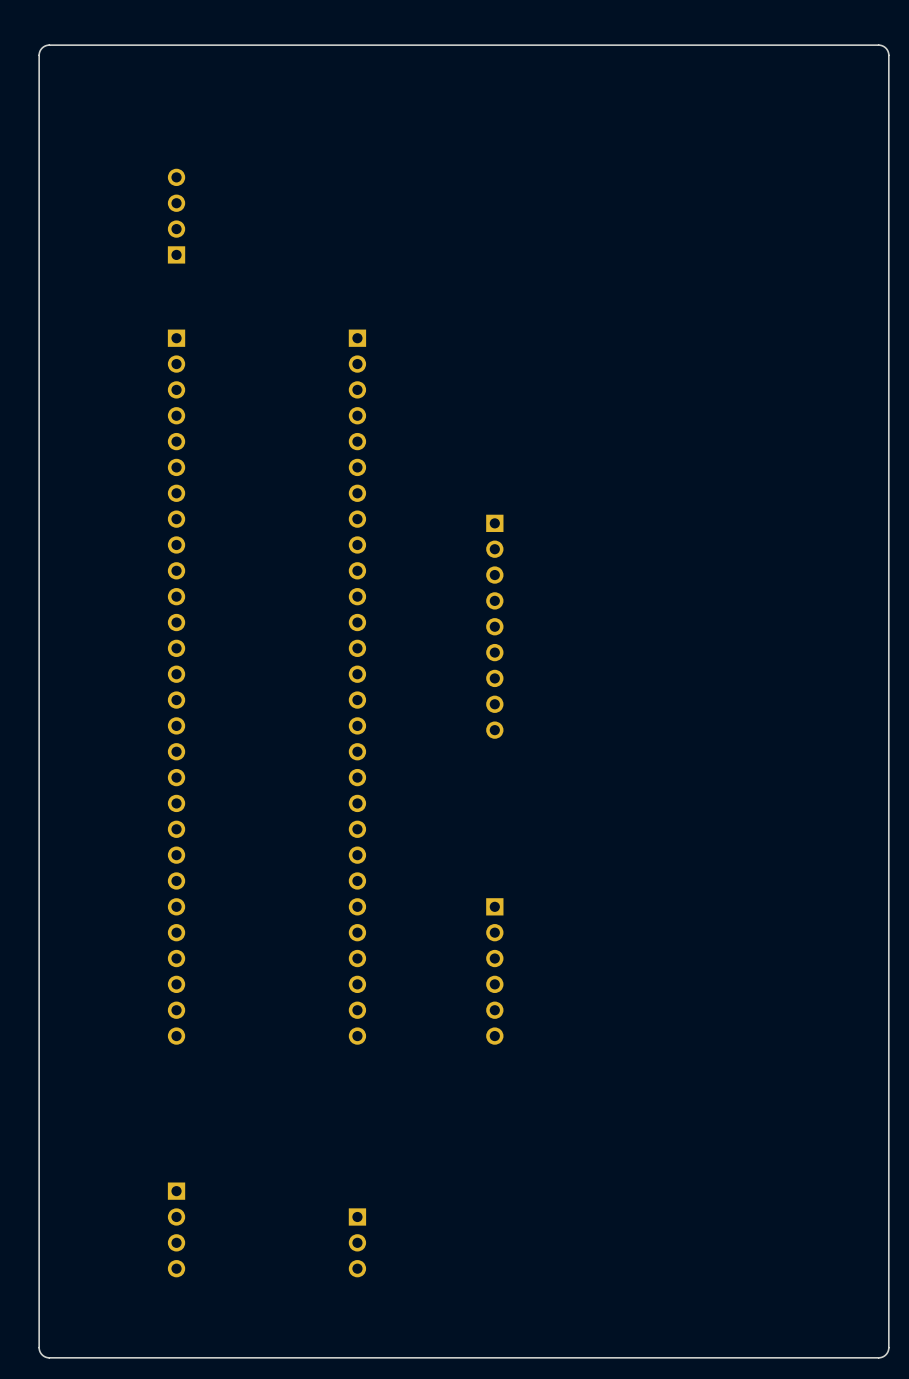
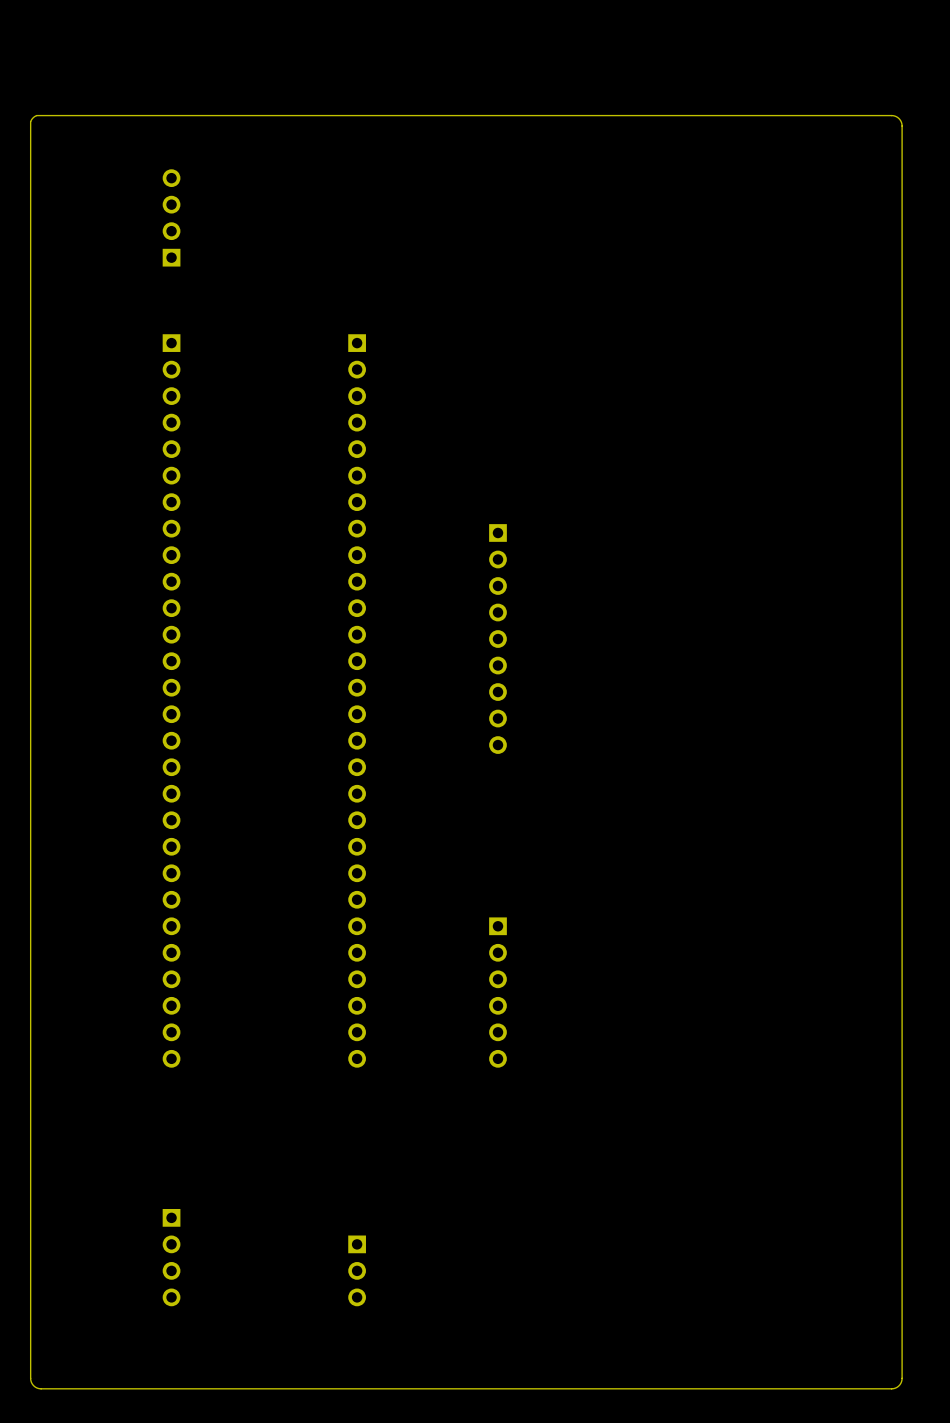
board edge: (39, 122) (39, 54) (42, 48) (48, 45) (878, 45) (885, 48) (888, 54) (888, 126) -> (30, 121) (36, 115) (891, 115) (899, 118) (902, 126)

